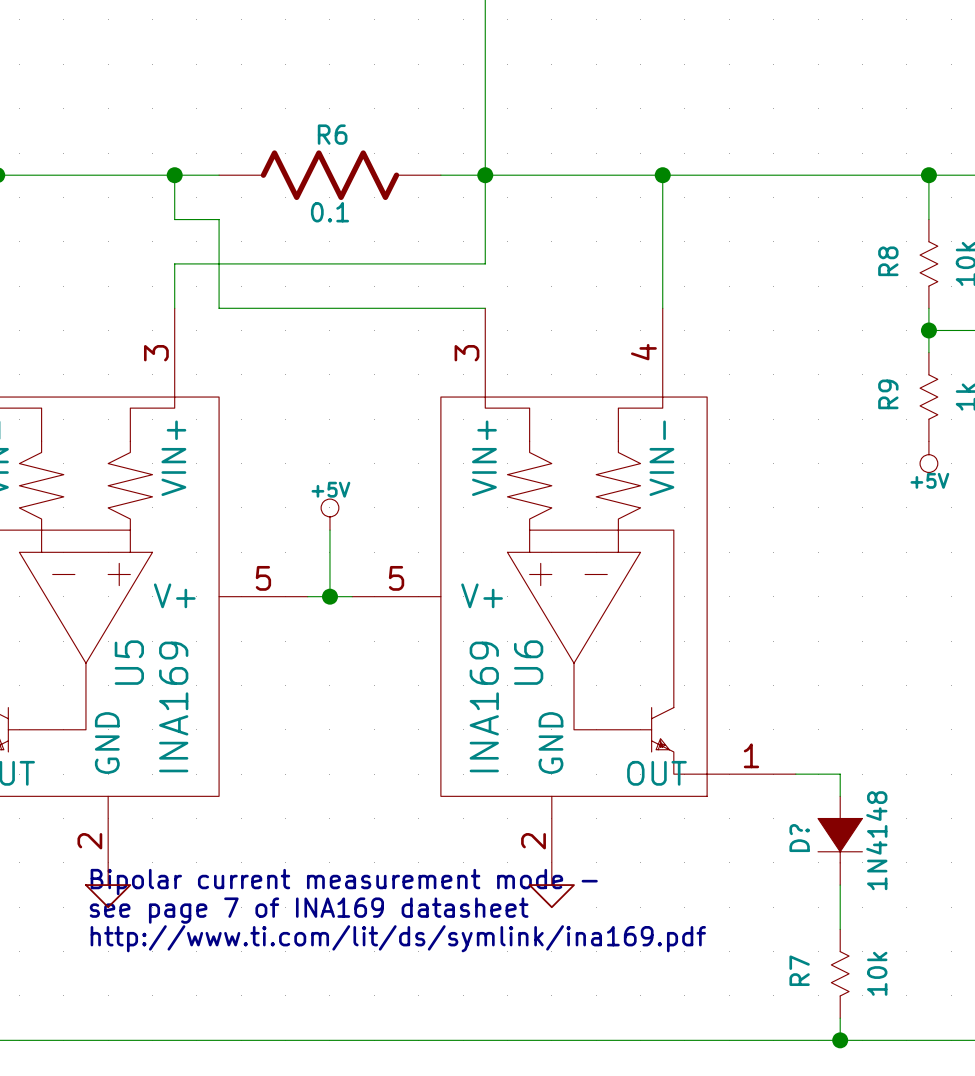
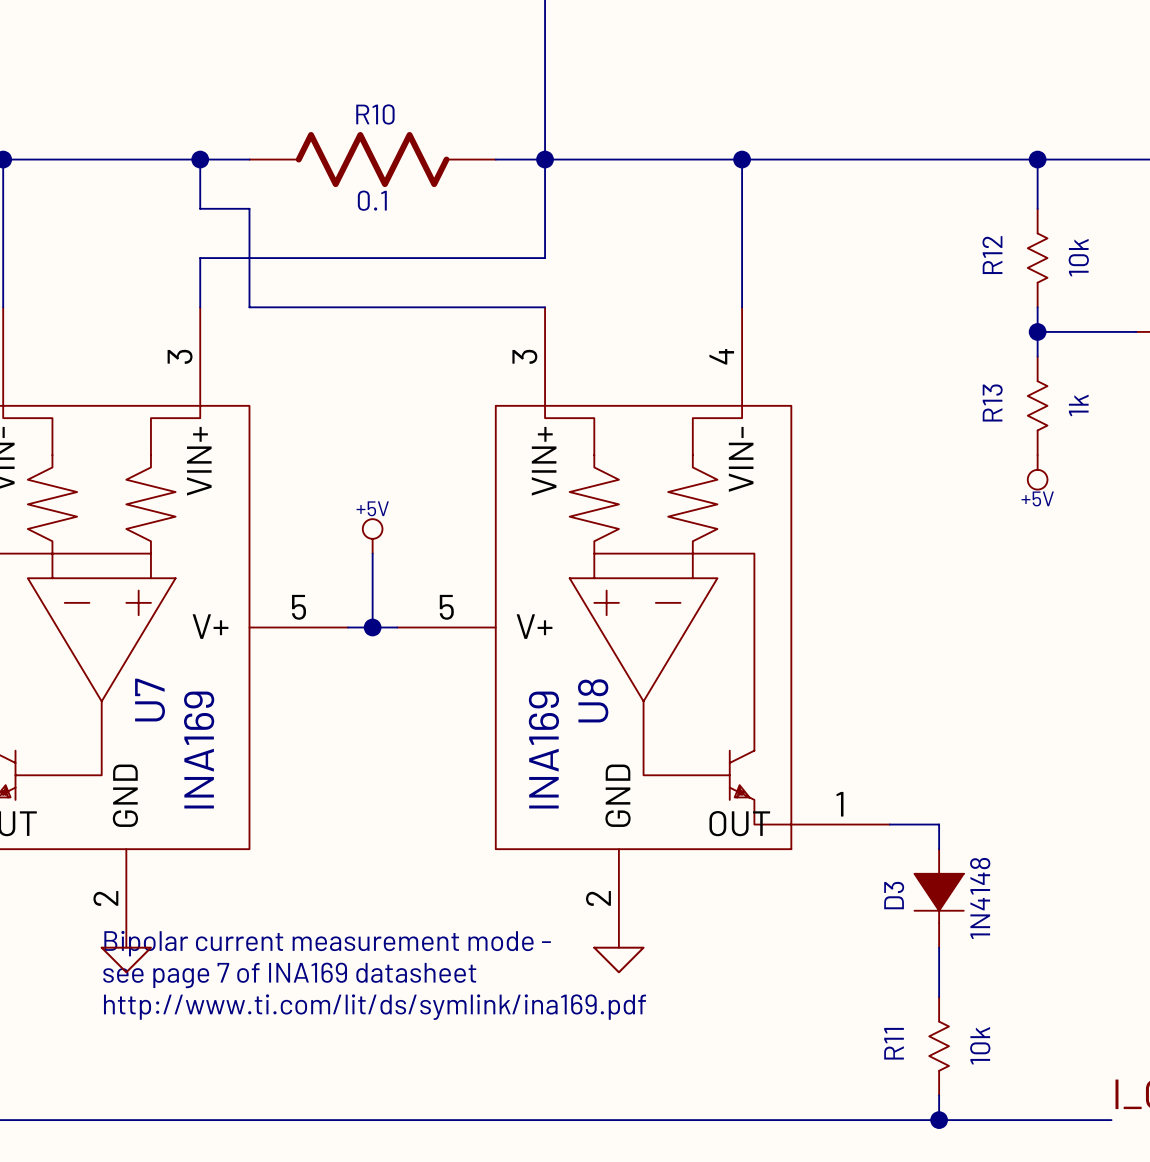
R6 name: R6 (332, 134) -> R10 (375, 114)
R8 name: R8 (888, 261) -> R12 (992, 255)
R9 name: R9 (888, 394) -> R13 (992, 402)
U5 name: U5 (129, 662) -> U7 (150, 700)
U6 name: U6 (528, 662) -> U8 (593, 700)
D? name: D? (799, 838) -> D3 (894, 895)
R7 name: R7 (799, 970) -> R11 (894, 1043)

